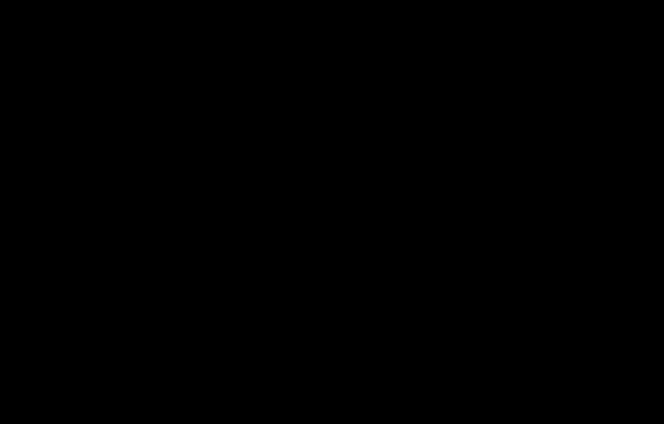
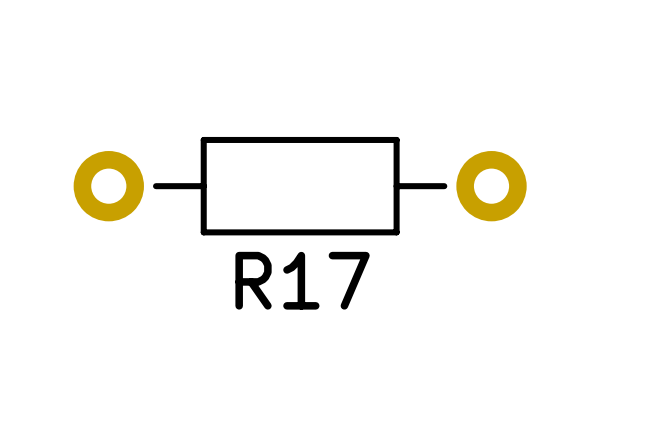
R17: none -> (300, 186)

